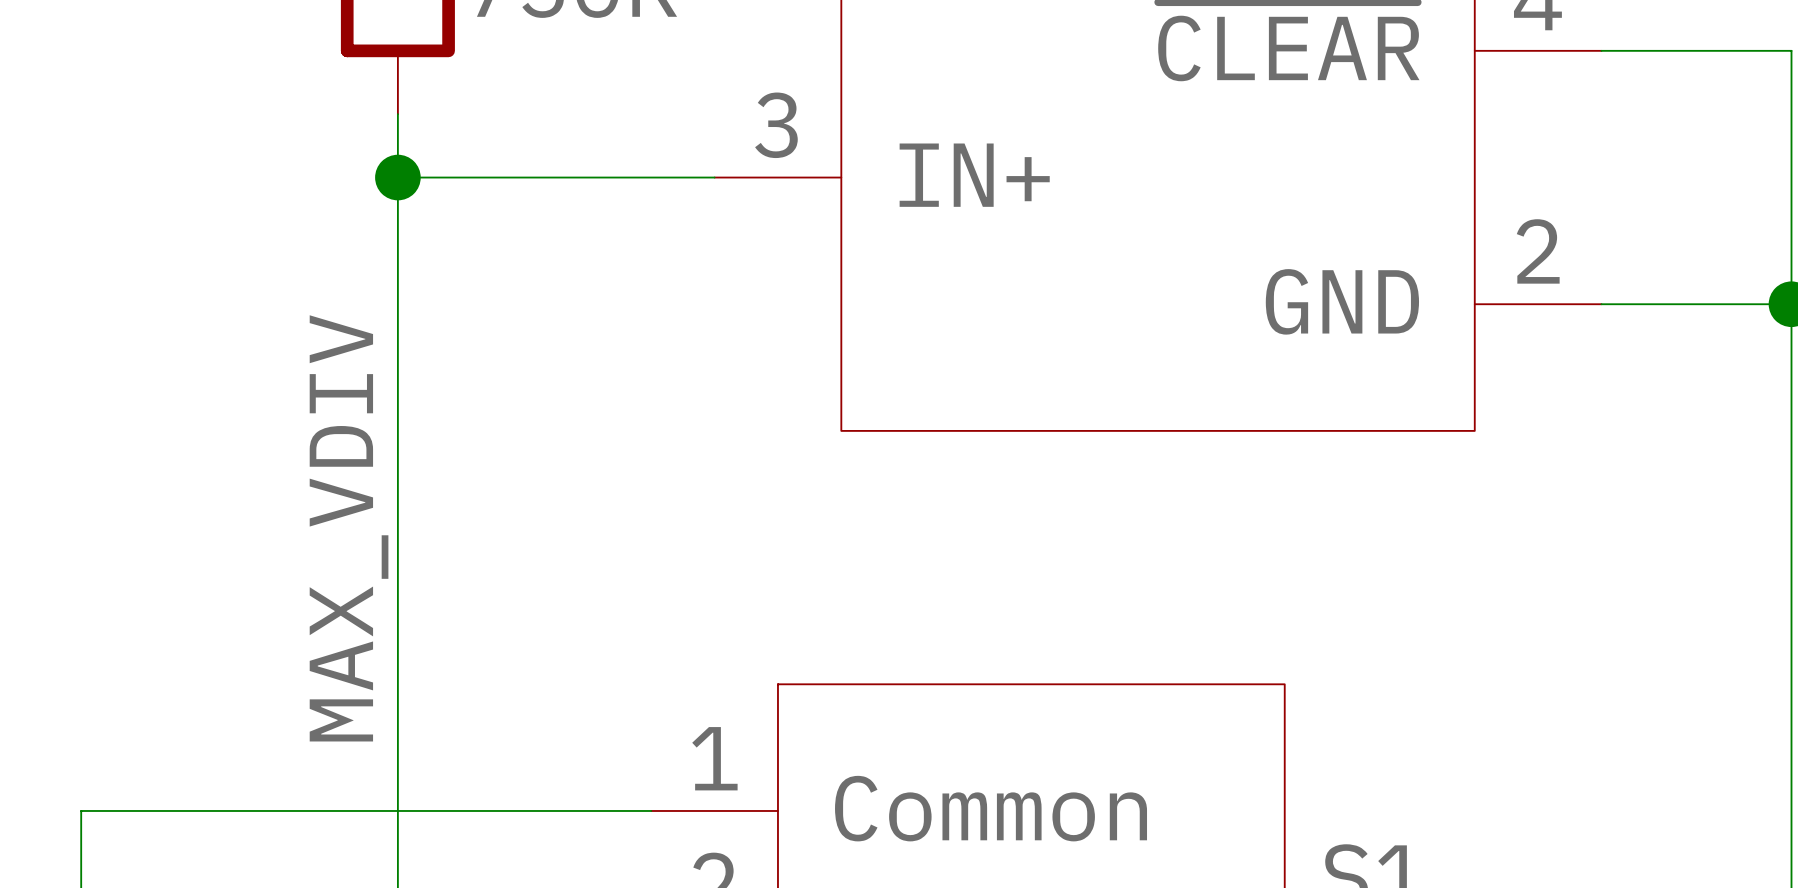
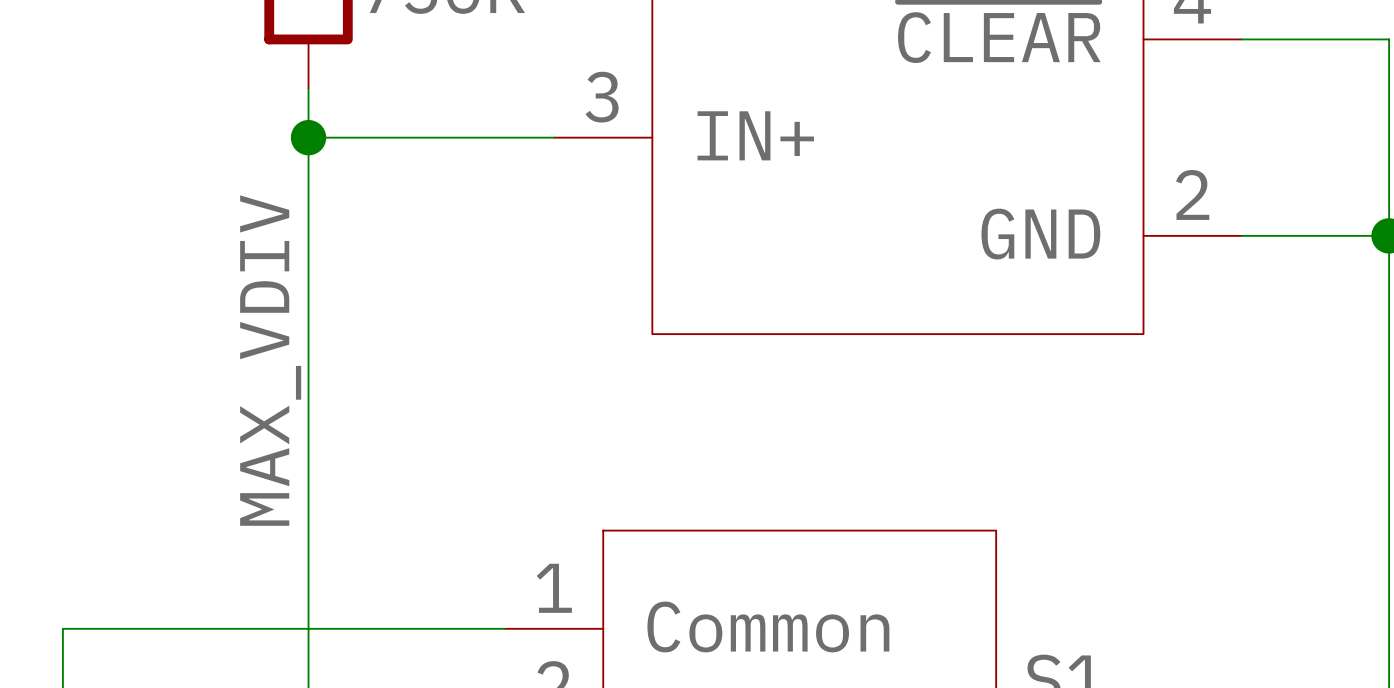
label position: MAX_VDIV (349, 528) -> MAX_VDIV (270, 360)

